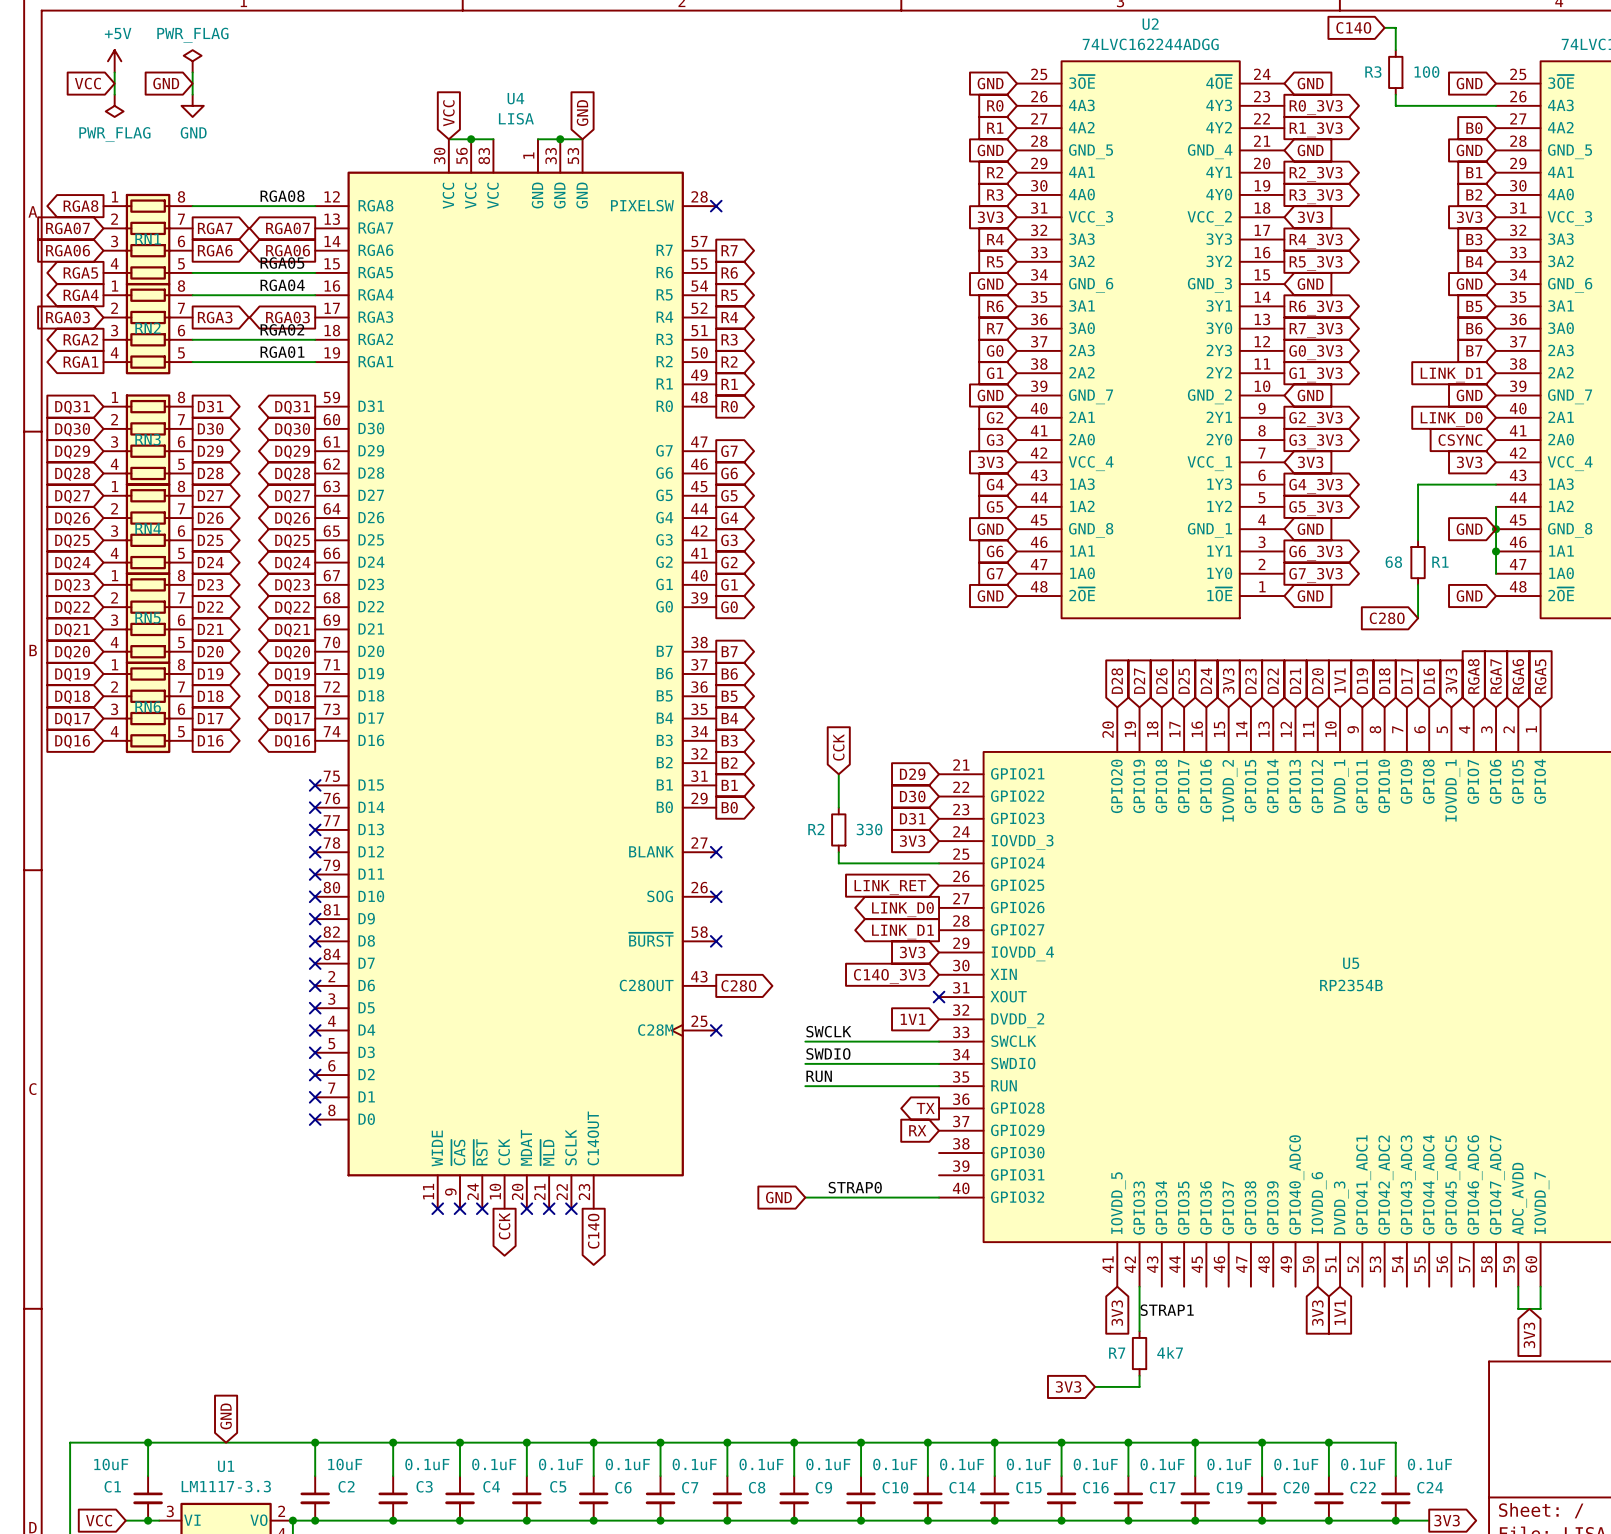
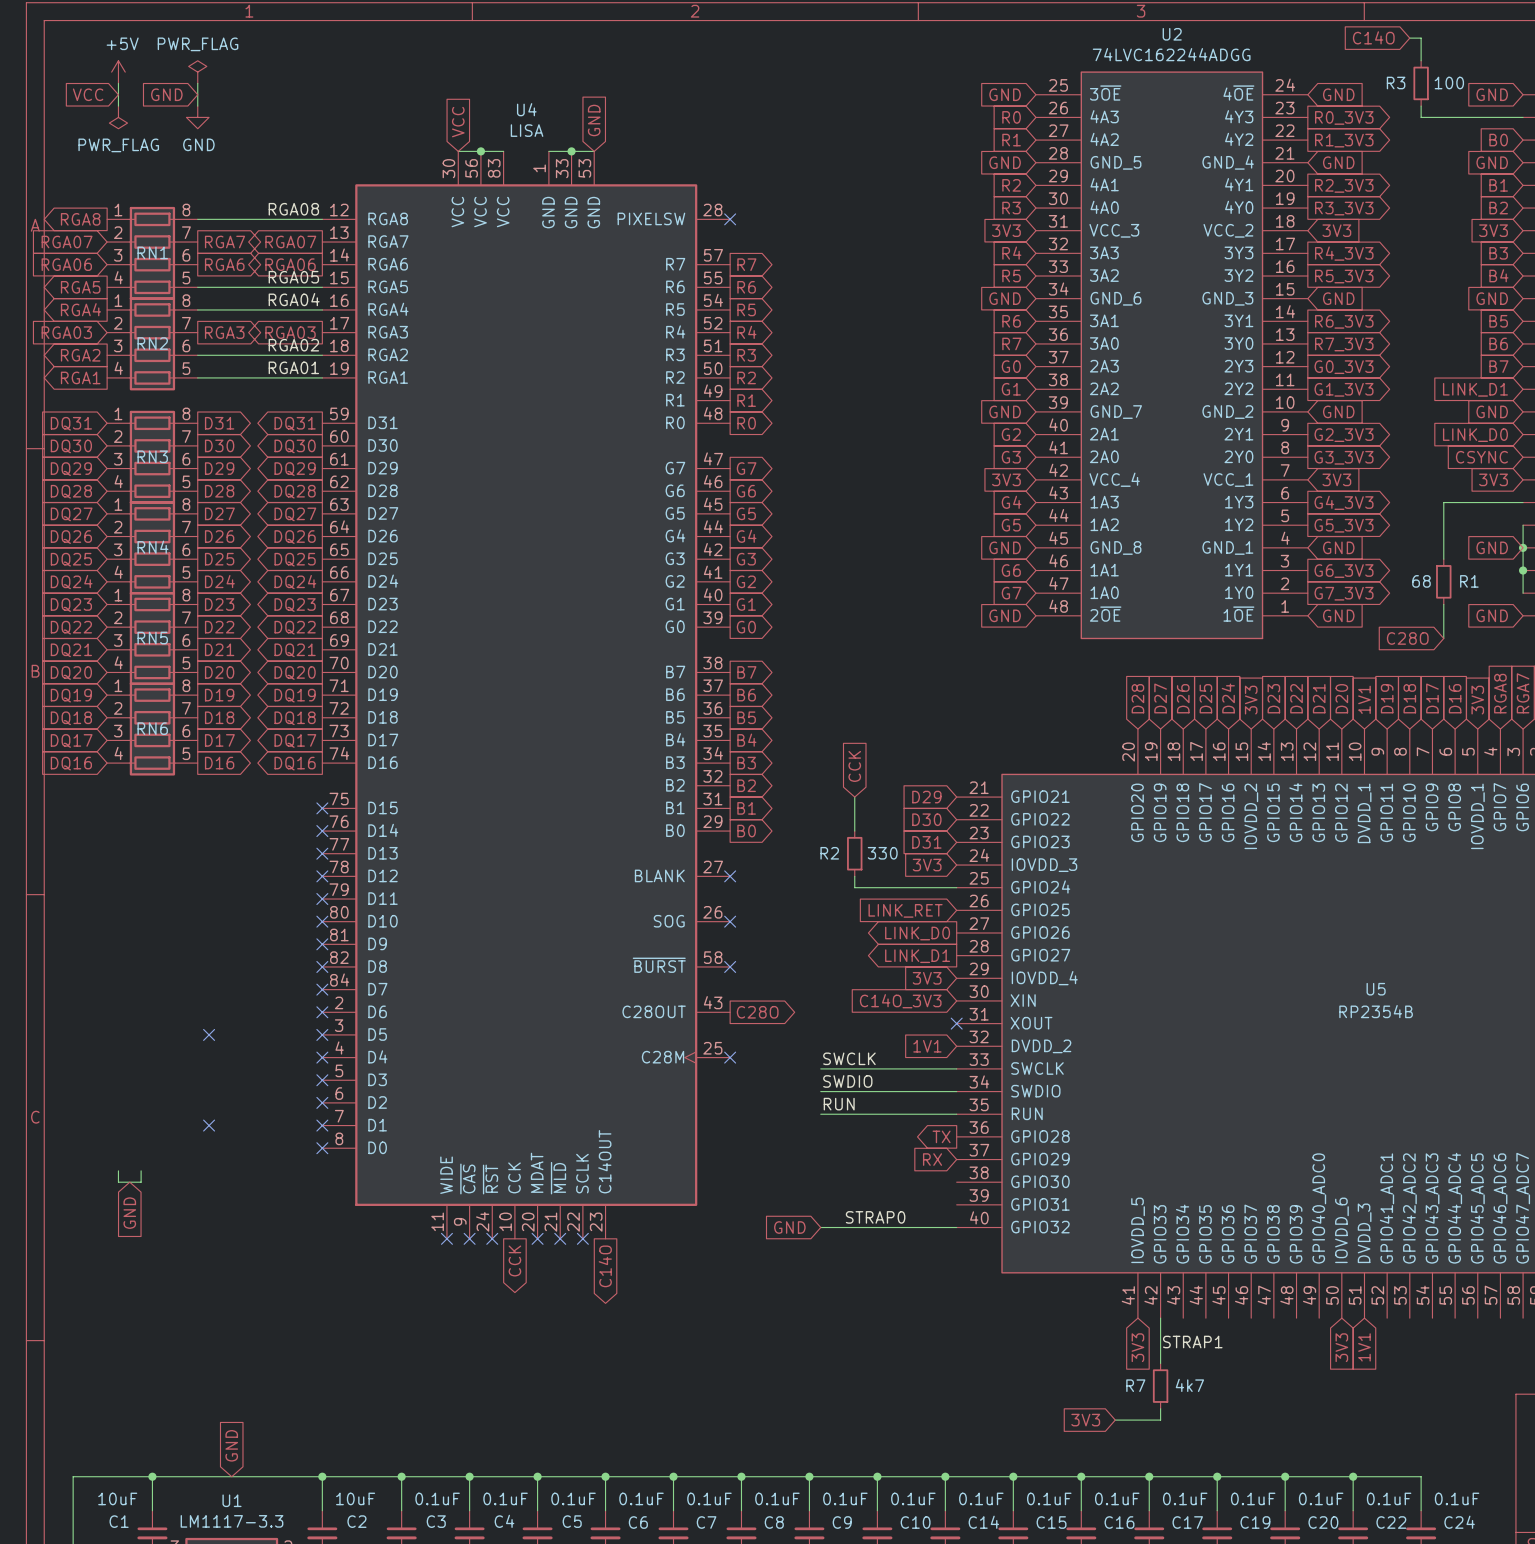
no-connect mark: none -> (209, 1034)
no-connect mark: none -> (209, 1125)
wire: none -> (118, 1170) (118, 1182) (141, 1182) (141, 1170)
global label: none -> GND (129, 1213)

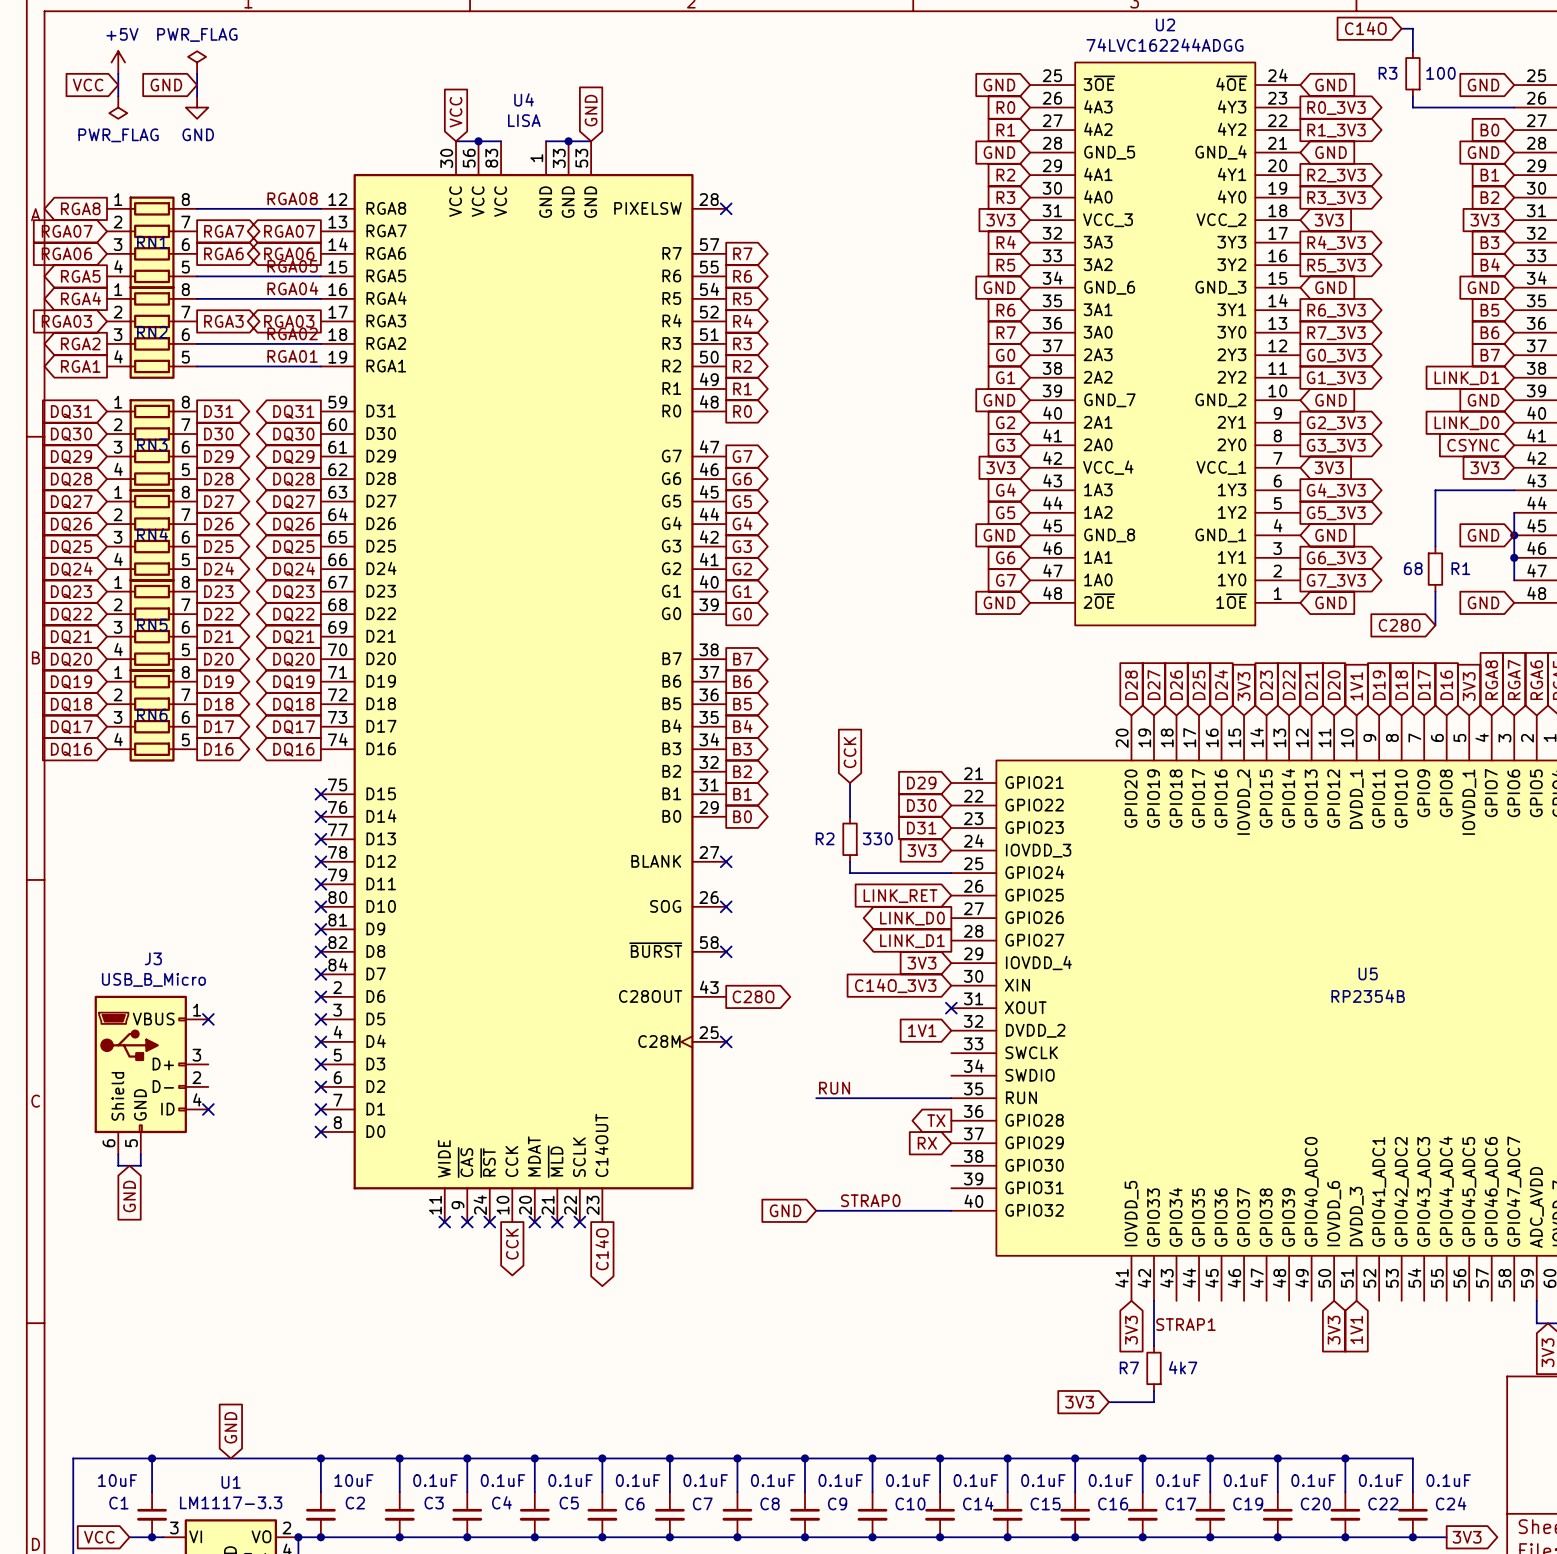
label: SWCLK (849, 1058) -> none
wire: (820, 1068) (956, 1068) -> none
label: SWDIO (847, 1081) -> none
J3: none -> USB_B_Micro (151, 1075)
wire: (820, 1091) (956, 1091) -> none

